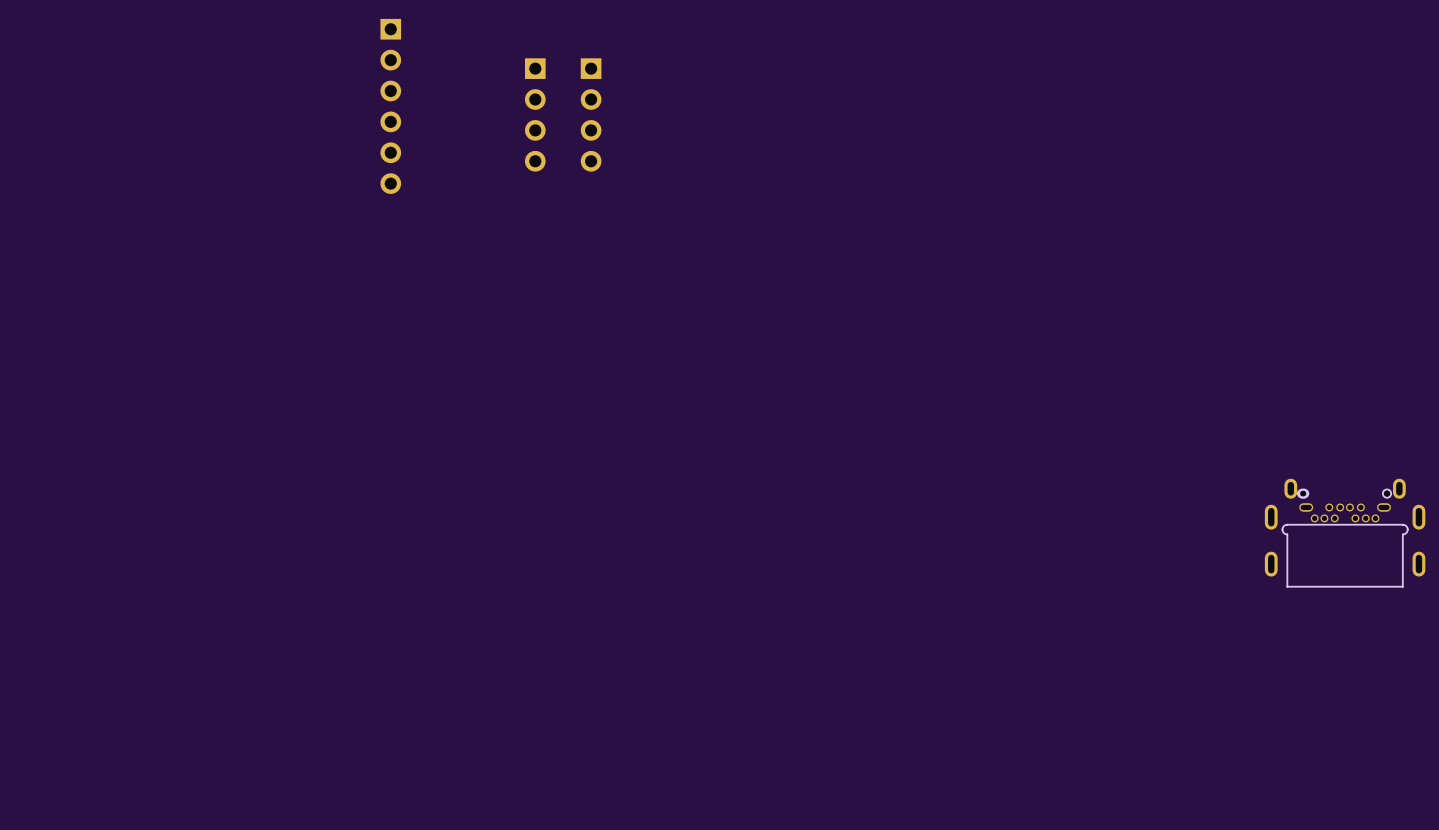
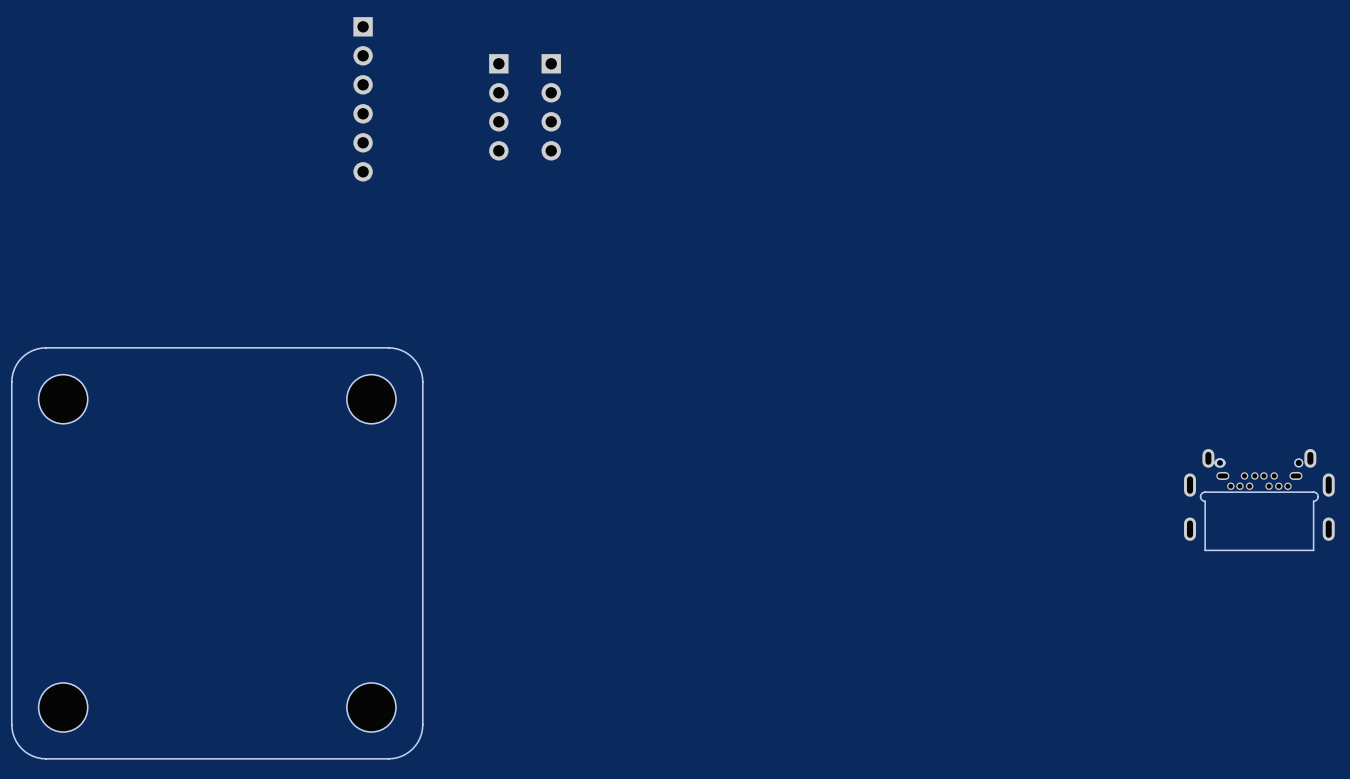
board edge: none -> (388, 347) (46, 347) (32, 350) (21, 357) (14, 369) (11, 382) (11, 724) (14, 737) (21, 748) (32, 756) (46, 758) (388, 758) (401, 756) (412, 748) (420, 737) (422, 724) (422, 382) (420, 369) (412, 357) (401, 350) (388, 347)
part: none -> (63, 399)
part: none -> (371, 399)
part: none -> (63, 707)
part: none -> (371, 707)

